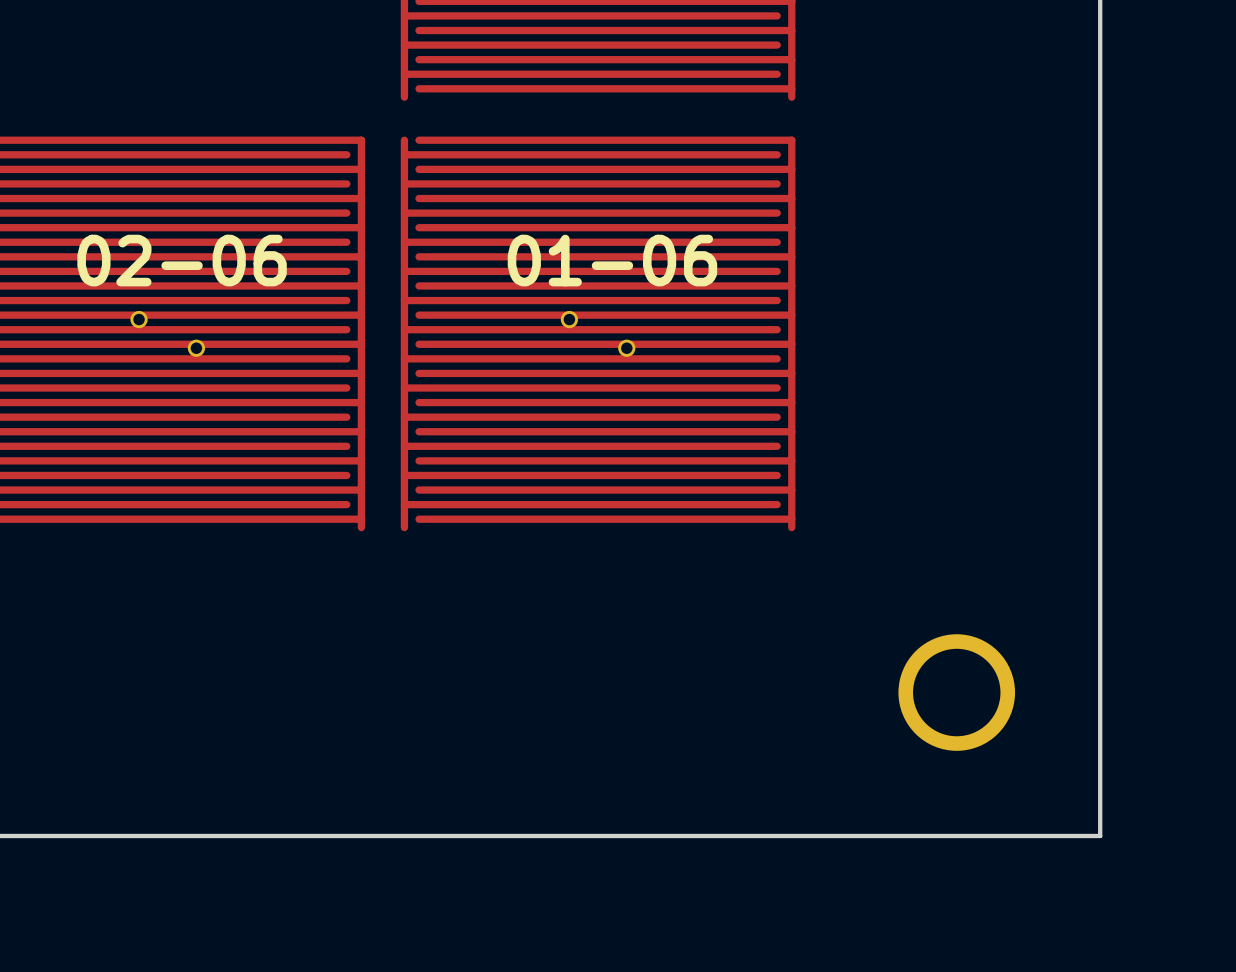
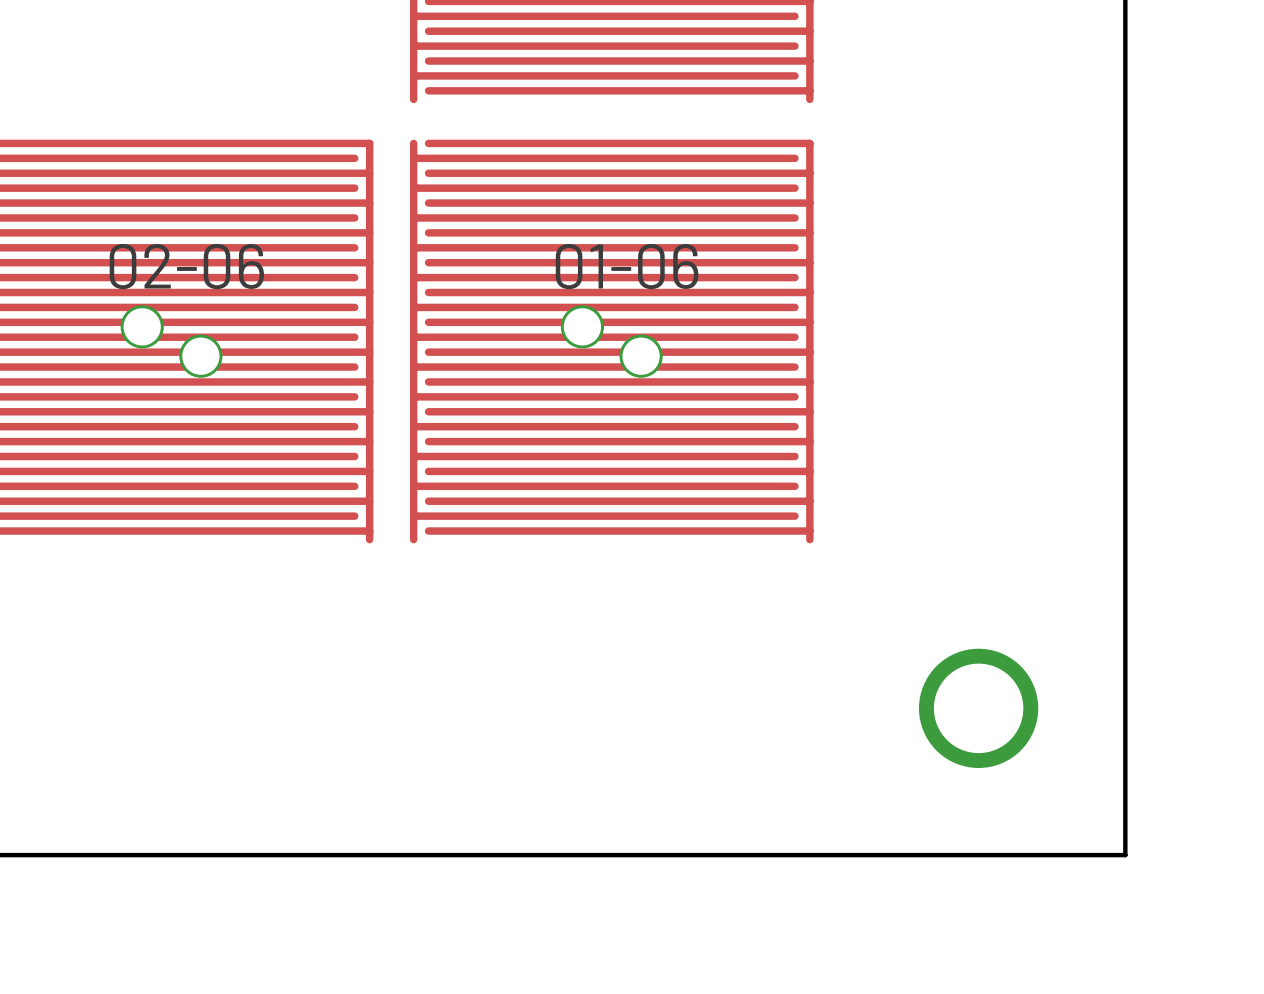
part footprint: [130, 310, 148, 329] -> [120, 305, 164, 349]
part footprint: [560, 310, 579, 329] -> [560, 305, 604, 349]
part footprint: [187, 339, 206, 357] -> [179, 334, 223, 378]
part footprint: [618, 339, 636, 357] -> [619, 334, 663, 378]

